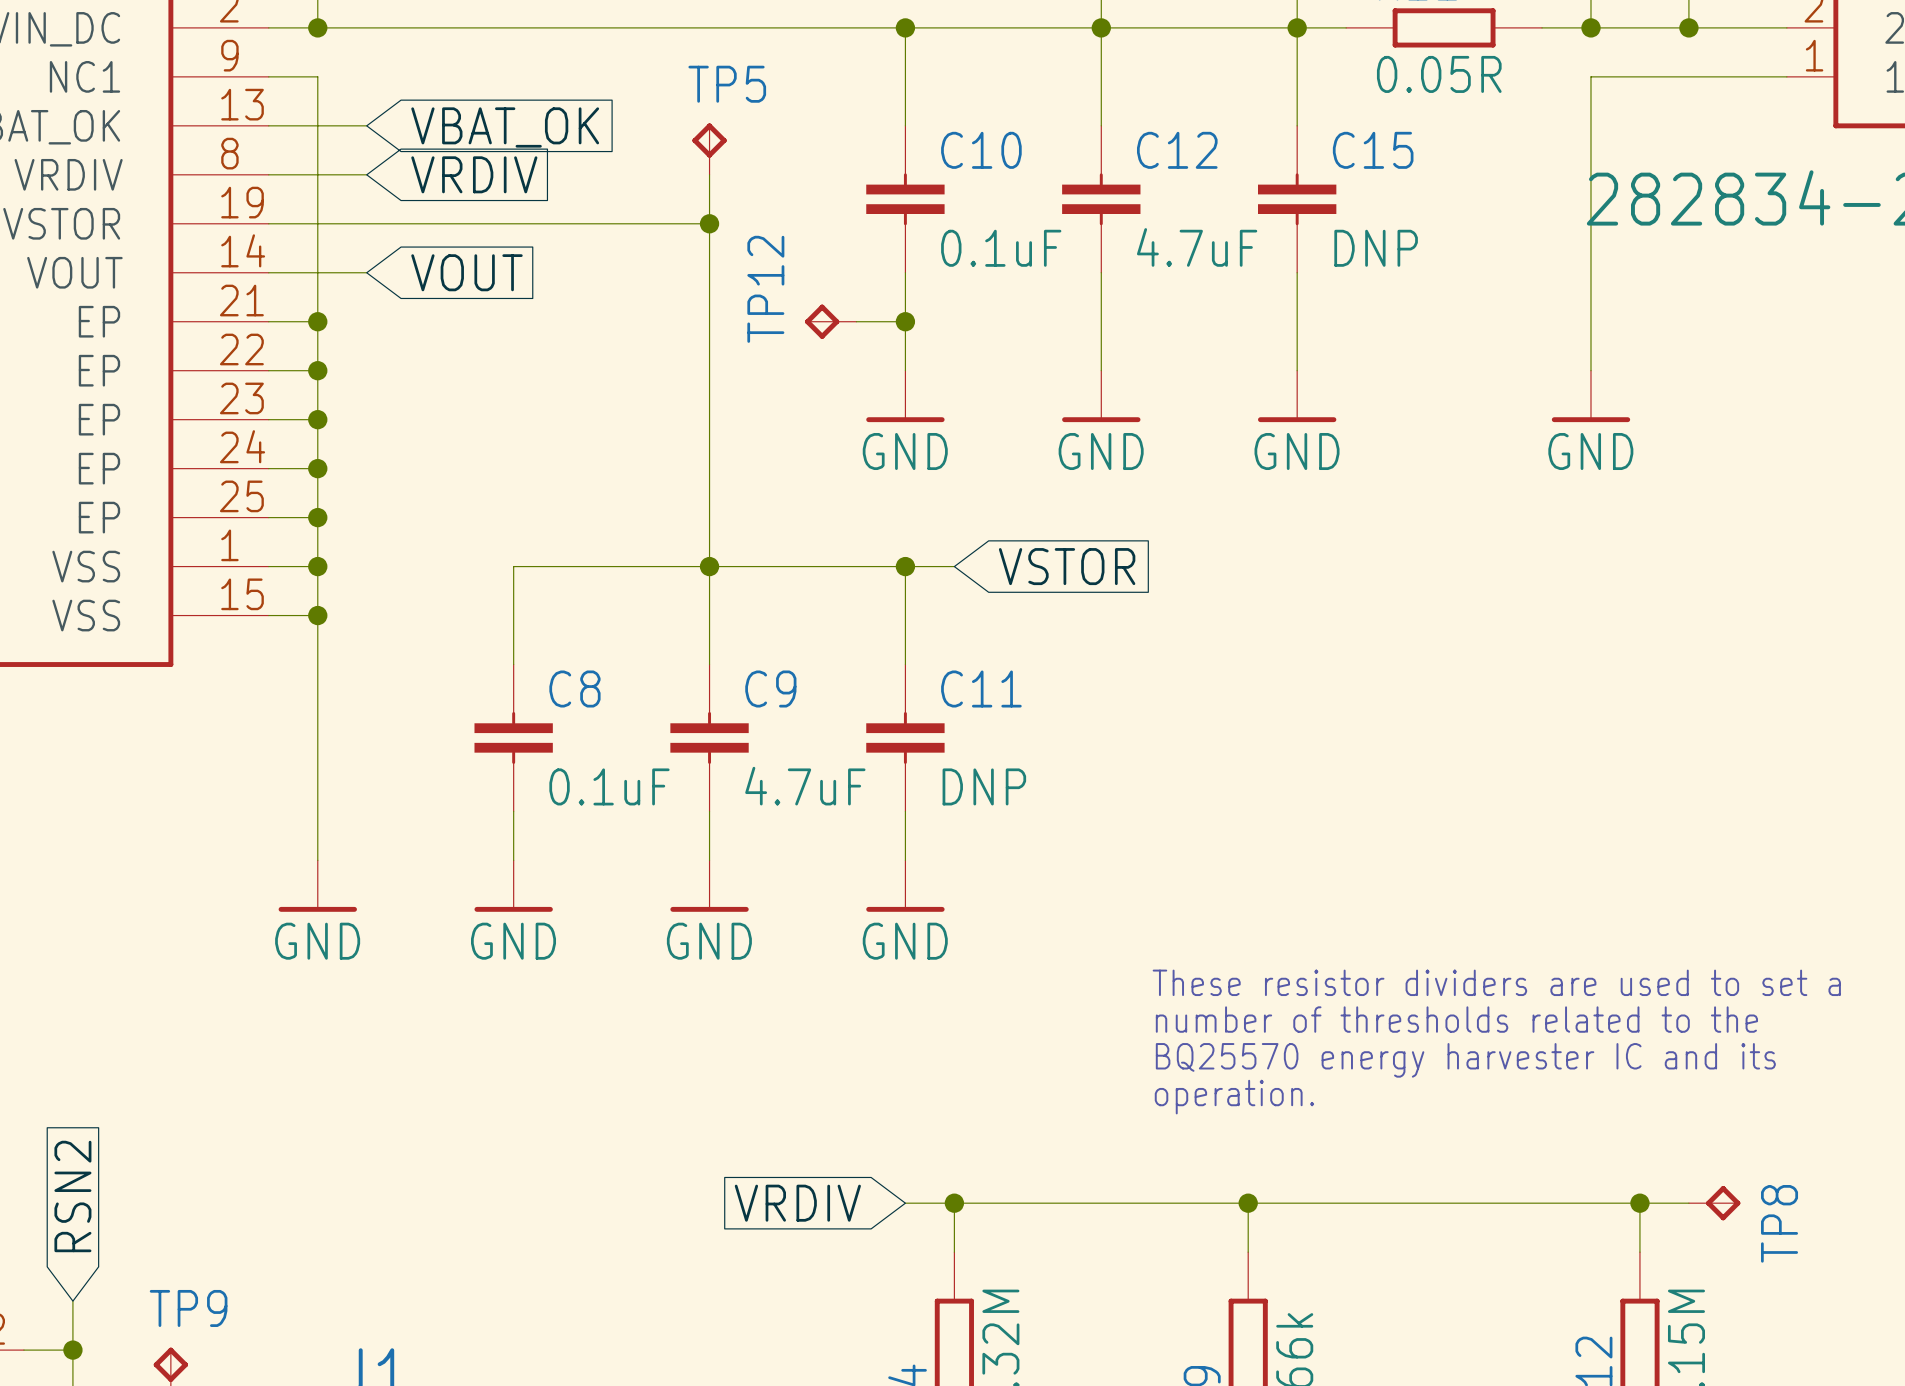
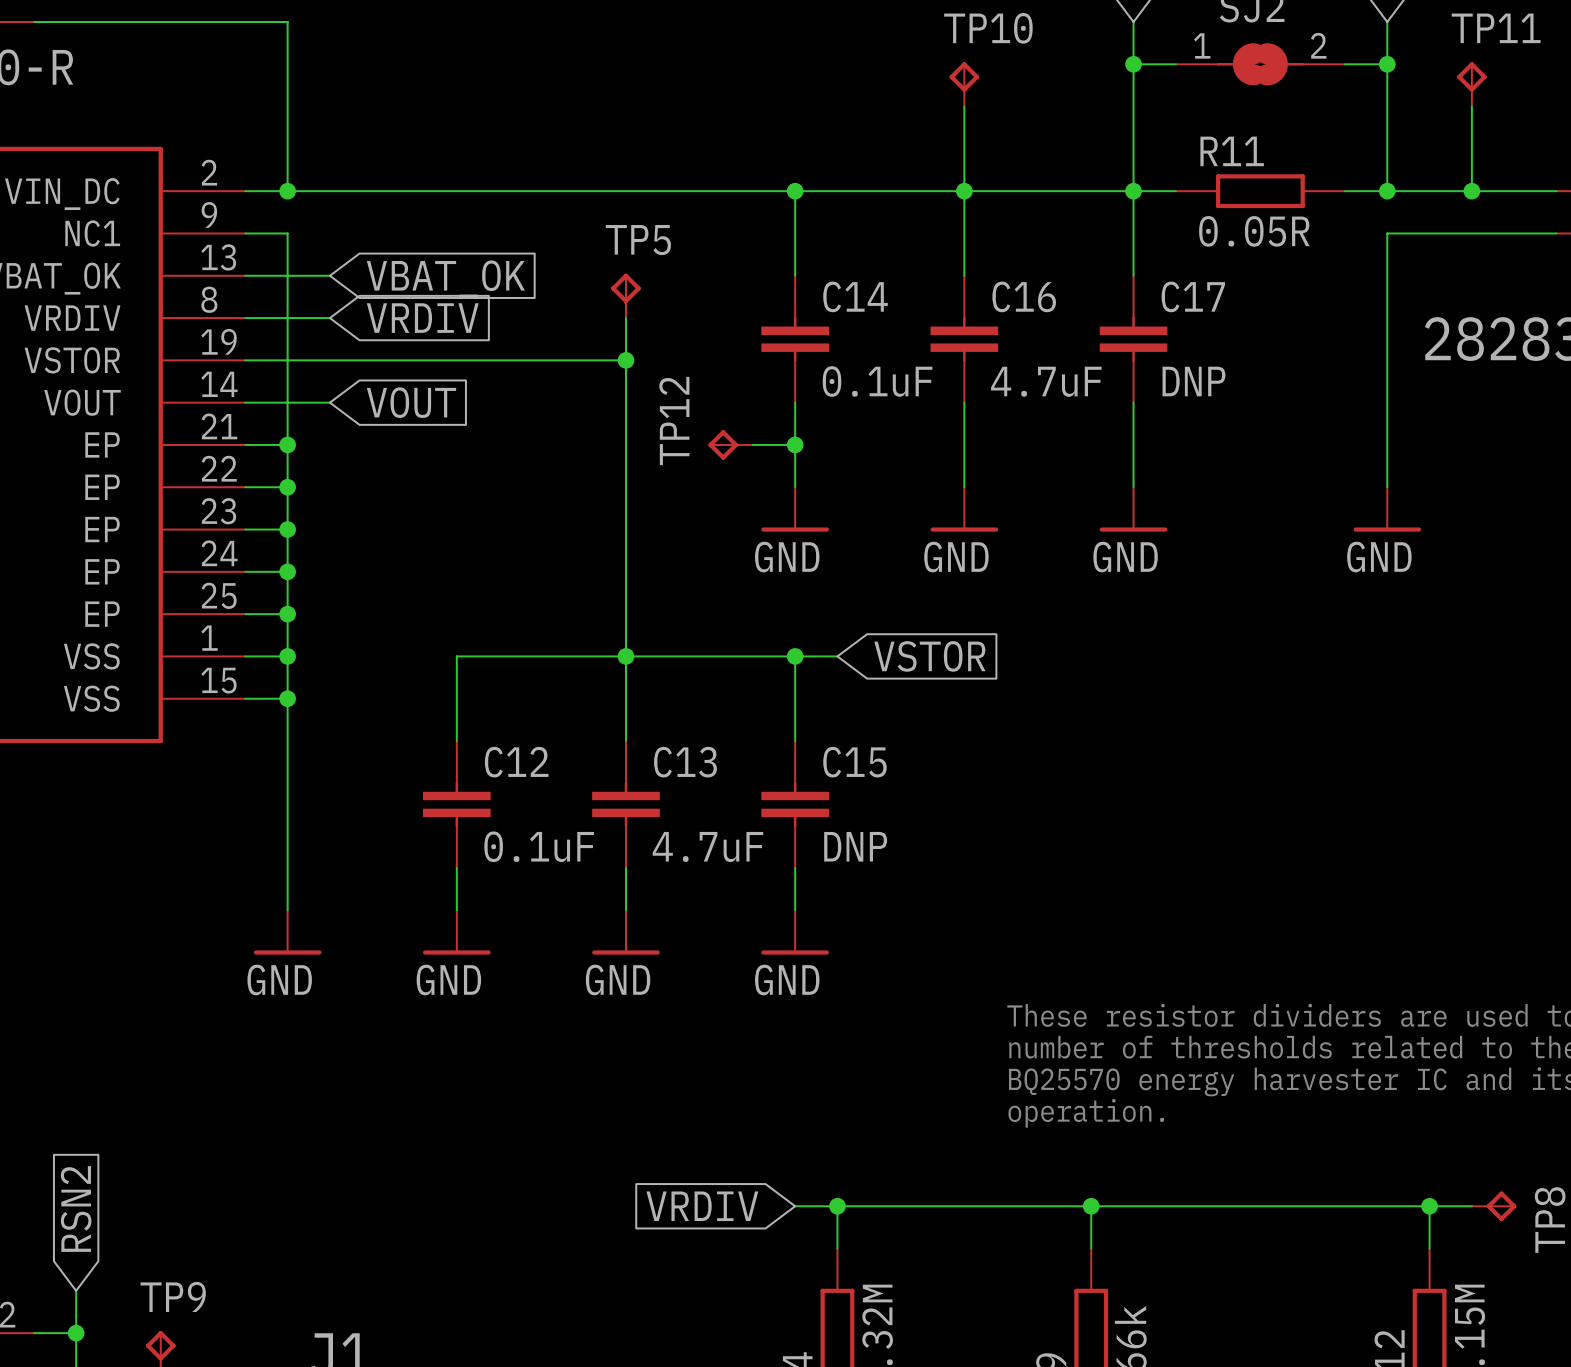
C10 name: C10 (981, 150) -> C14 (855, 296)
C12 name: C12 (1177, 150) -> C16 (1024, 296)
C15 name: C15 (1373, 150) -> C17 (1193, 296)
C8 name: C8 (574, 689) -> C12 (516, 762)
C9 name: C9 (770, 689) -> C13 (685, 762)
C11 name: C11 (981, 689) -> C15 (854, 762)

